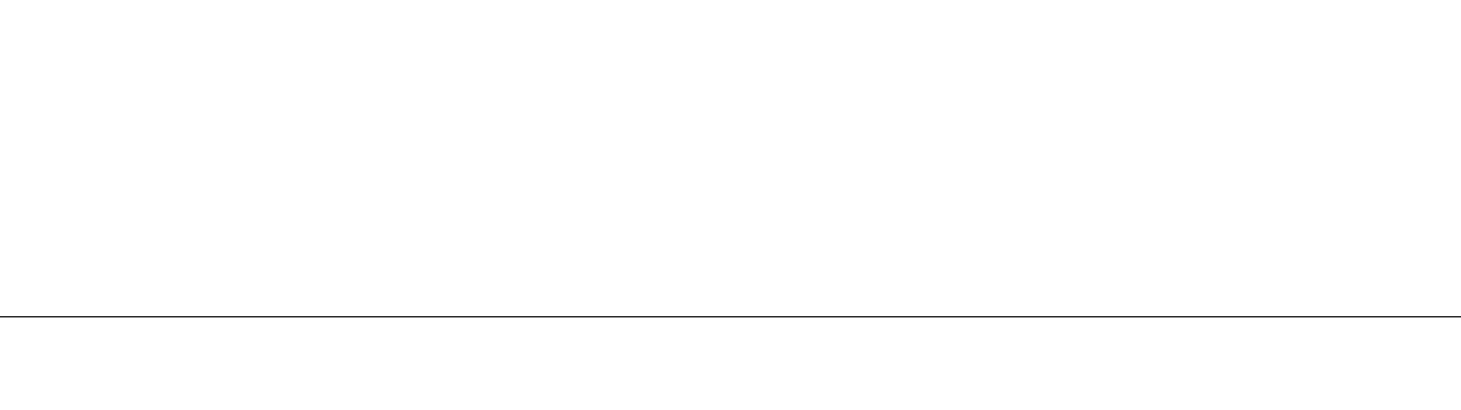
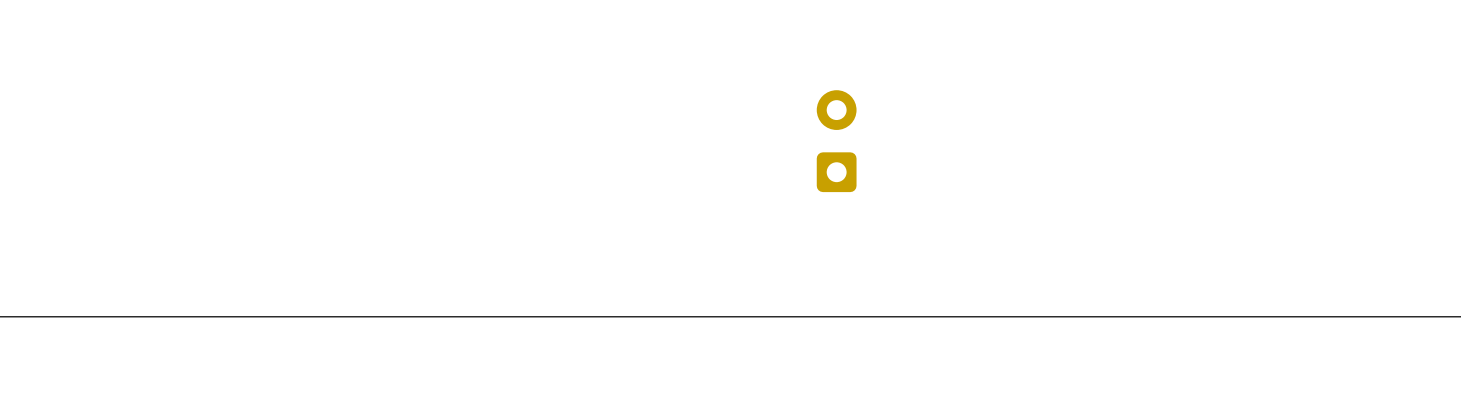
part: none -> (836, 141)

